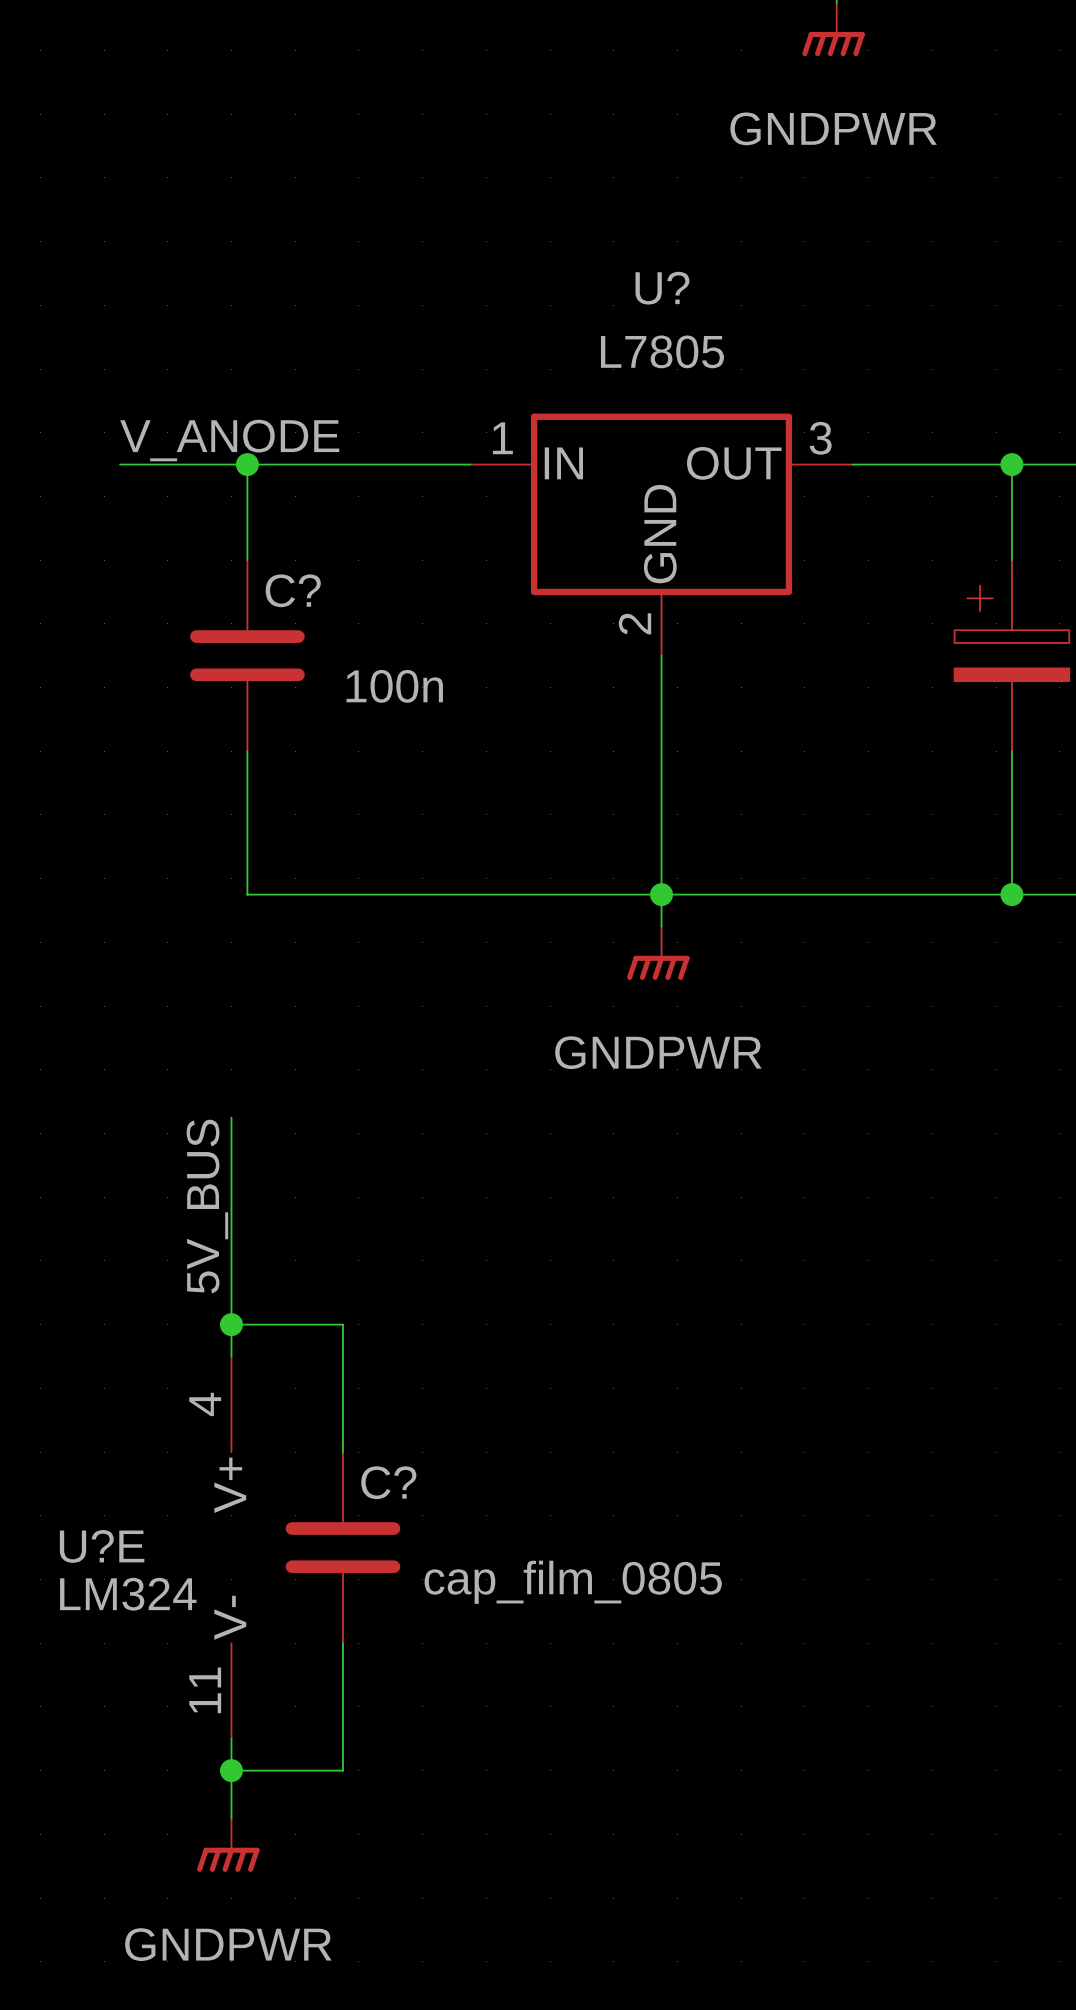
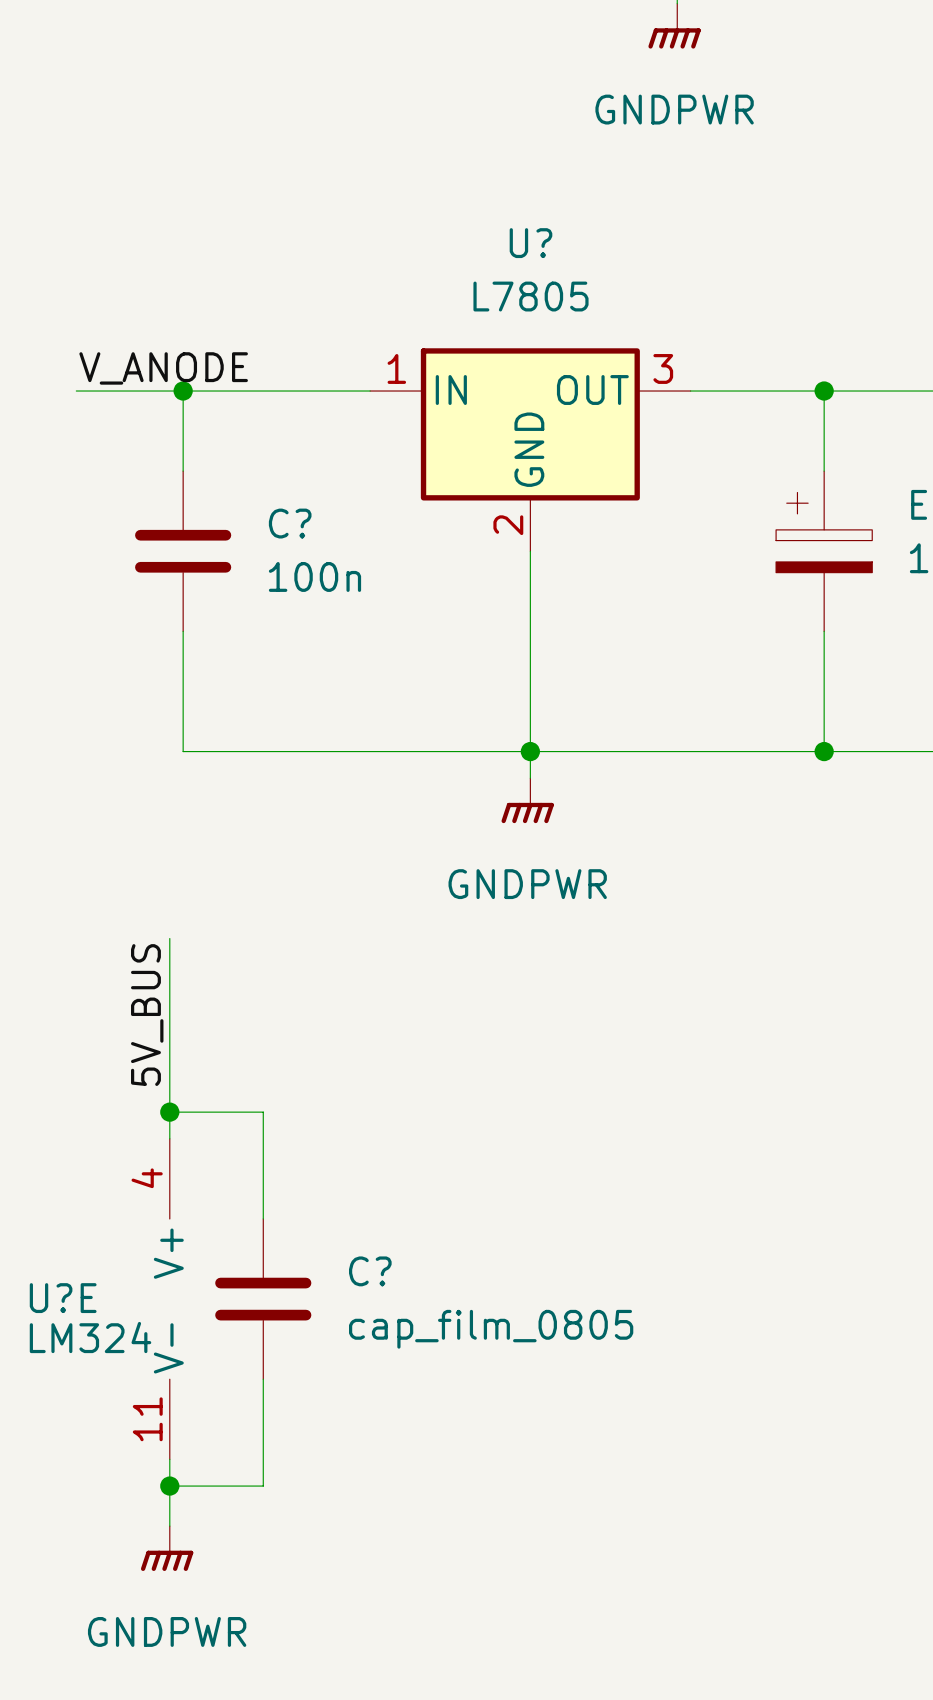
C? name position: C? (293, 590) -> C? (290, 523)
C? name position: C? (388, 1482) -> C? (370, 1271)
C? value position: cap_film_0805 (573, 1582) -> cap_film_0805 (491, 1329)

